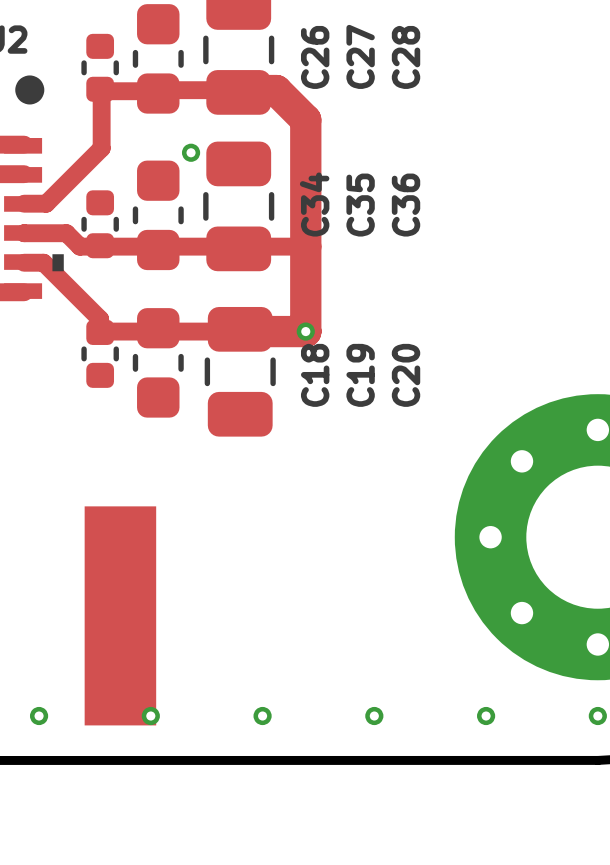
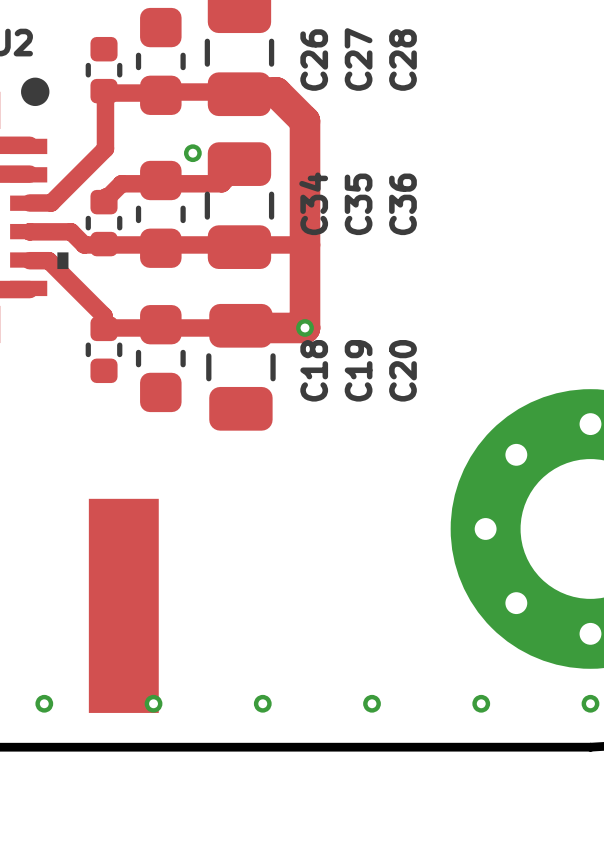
track: none -> (239, 166) (221, 183) (121, 183) (106, 196) (104, 201)

